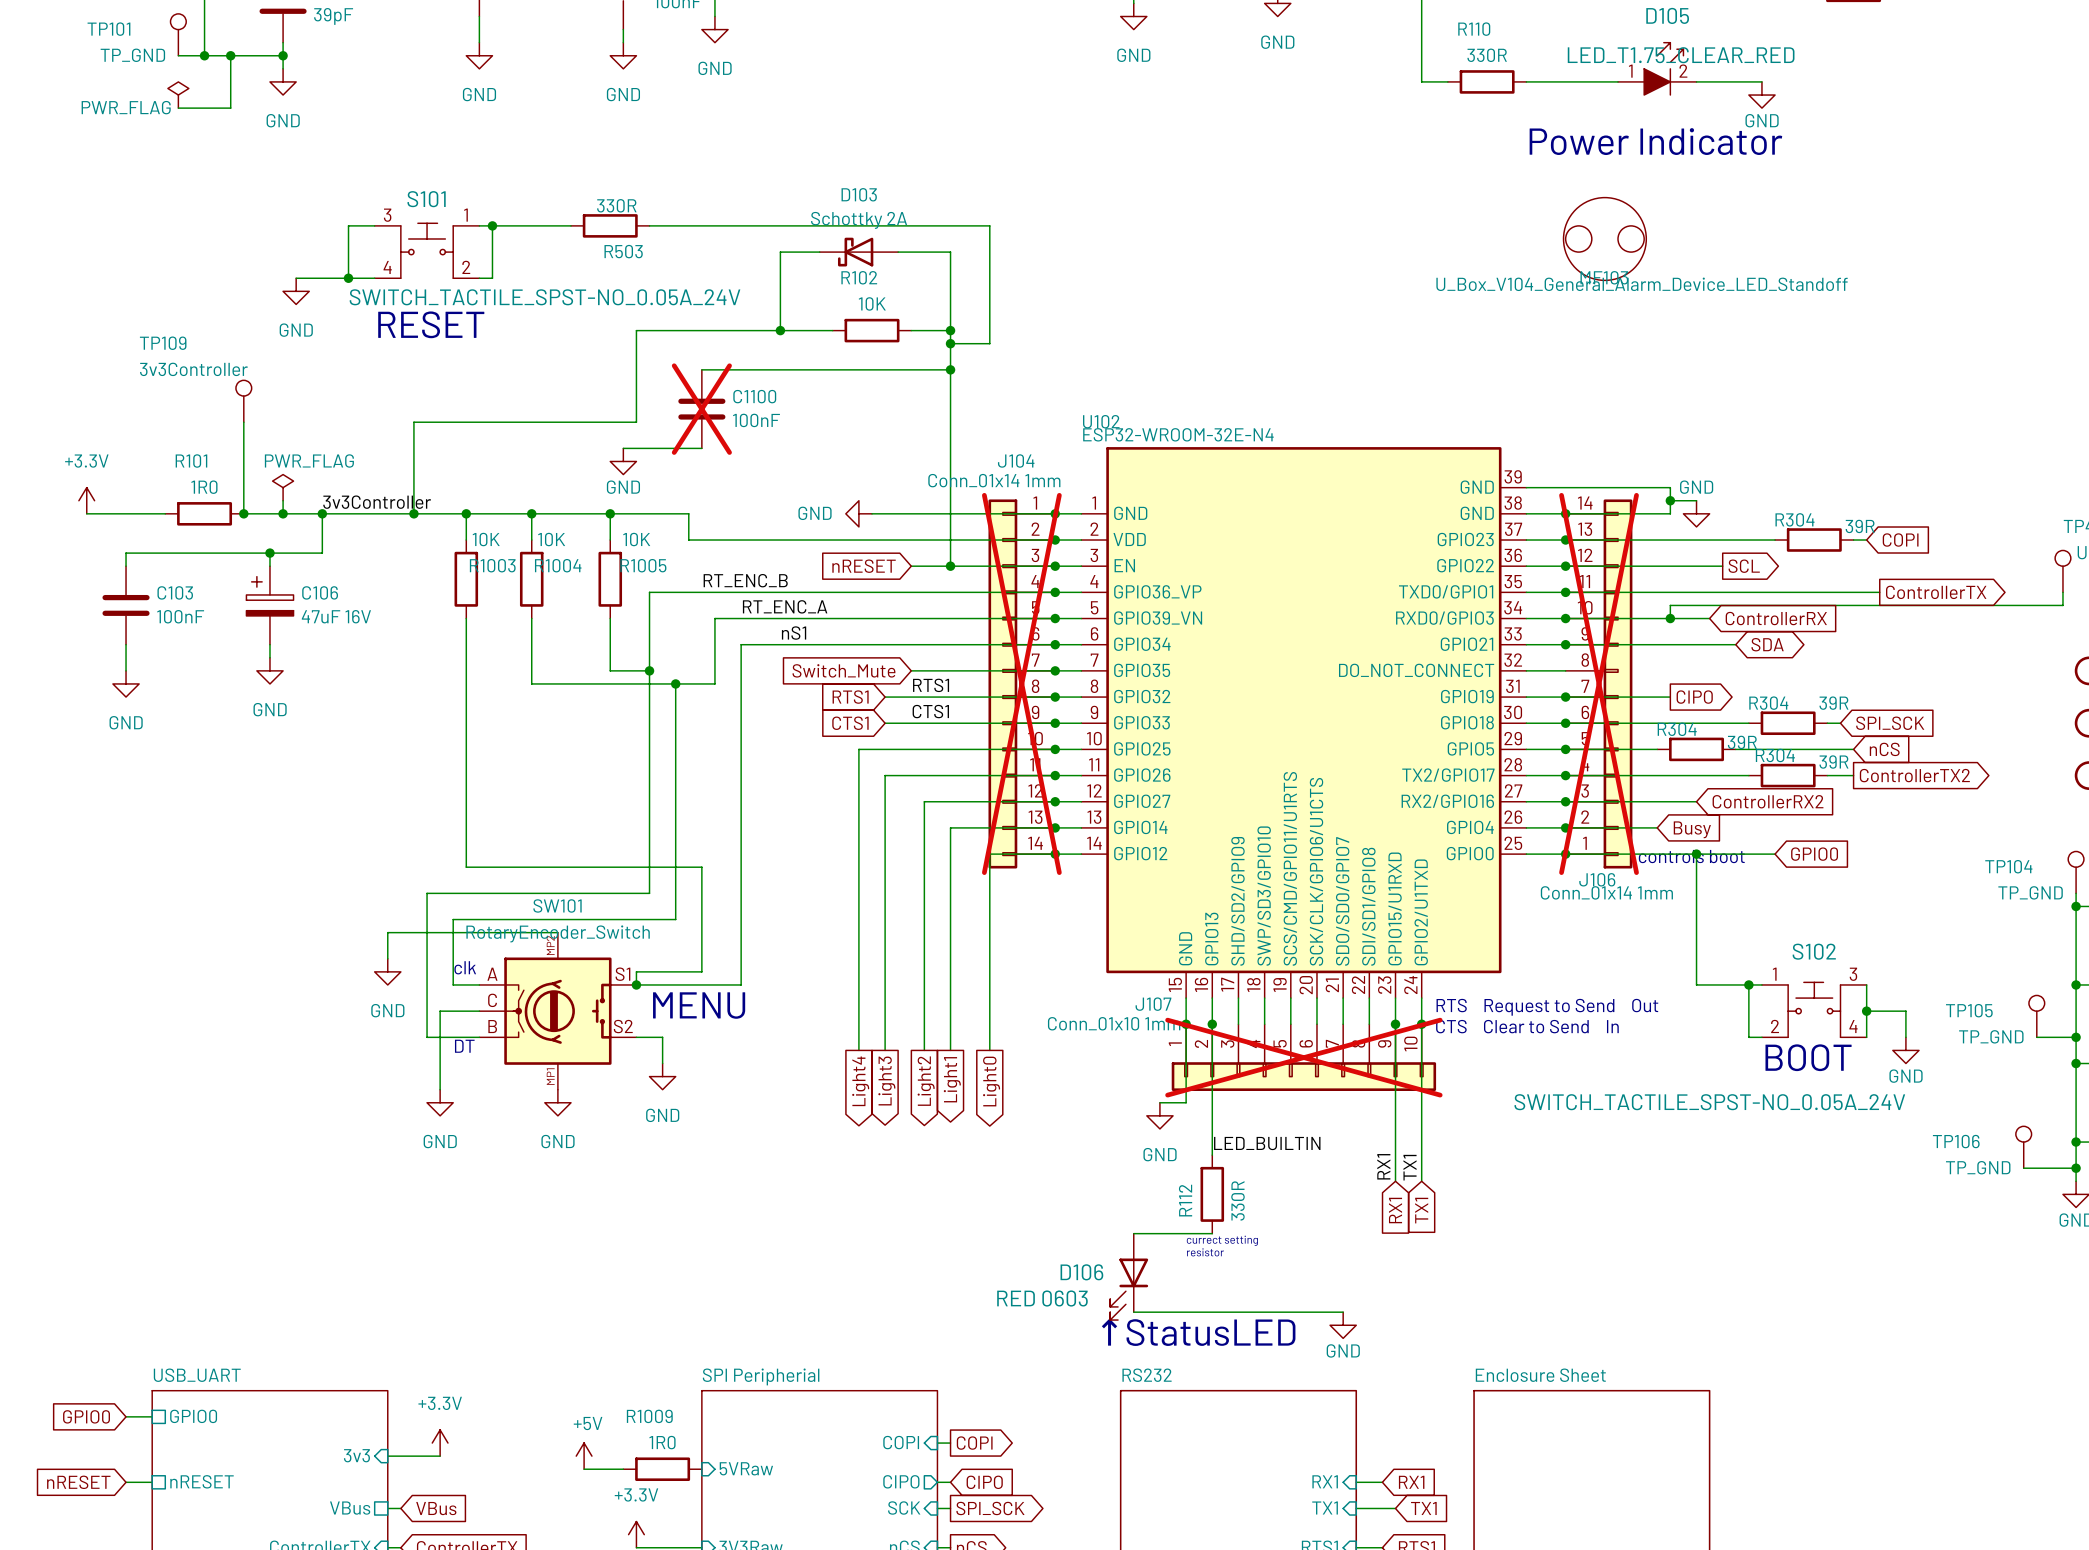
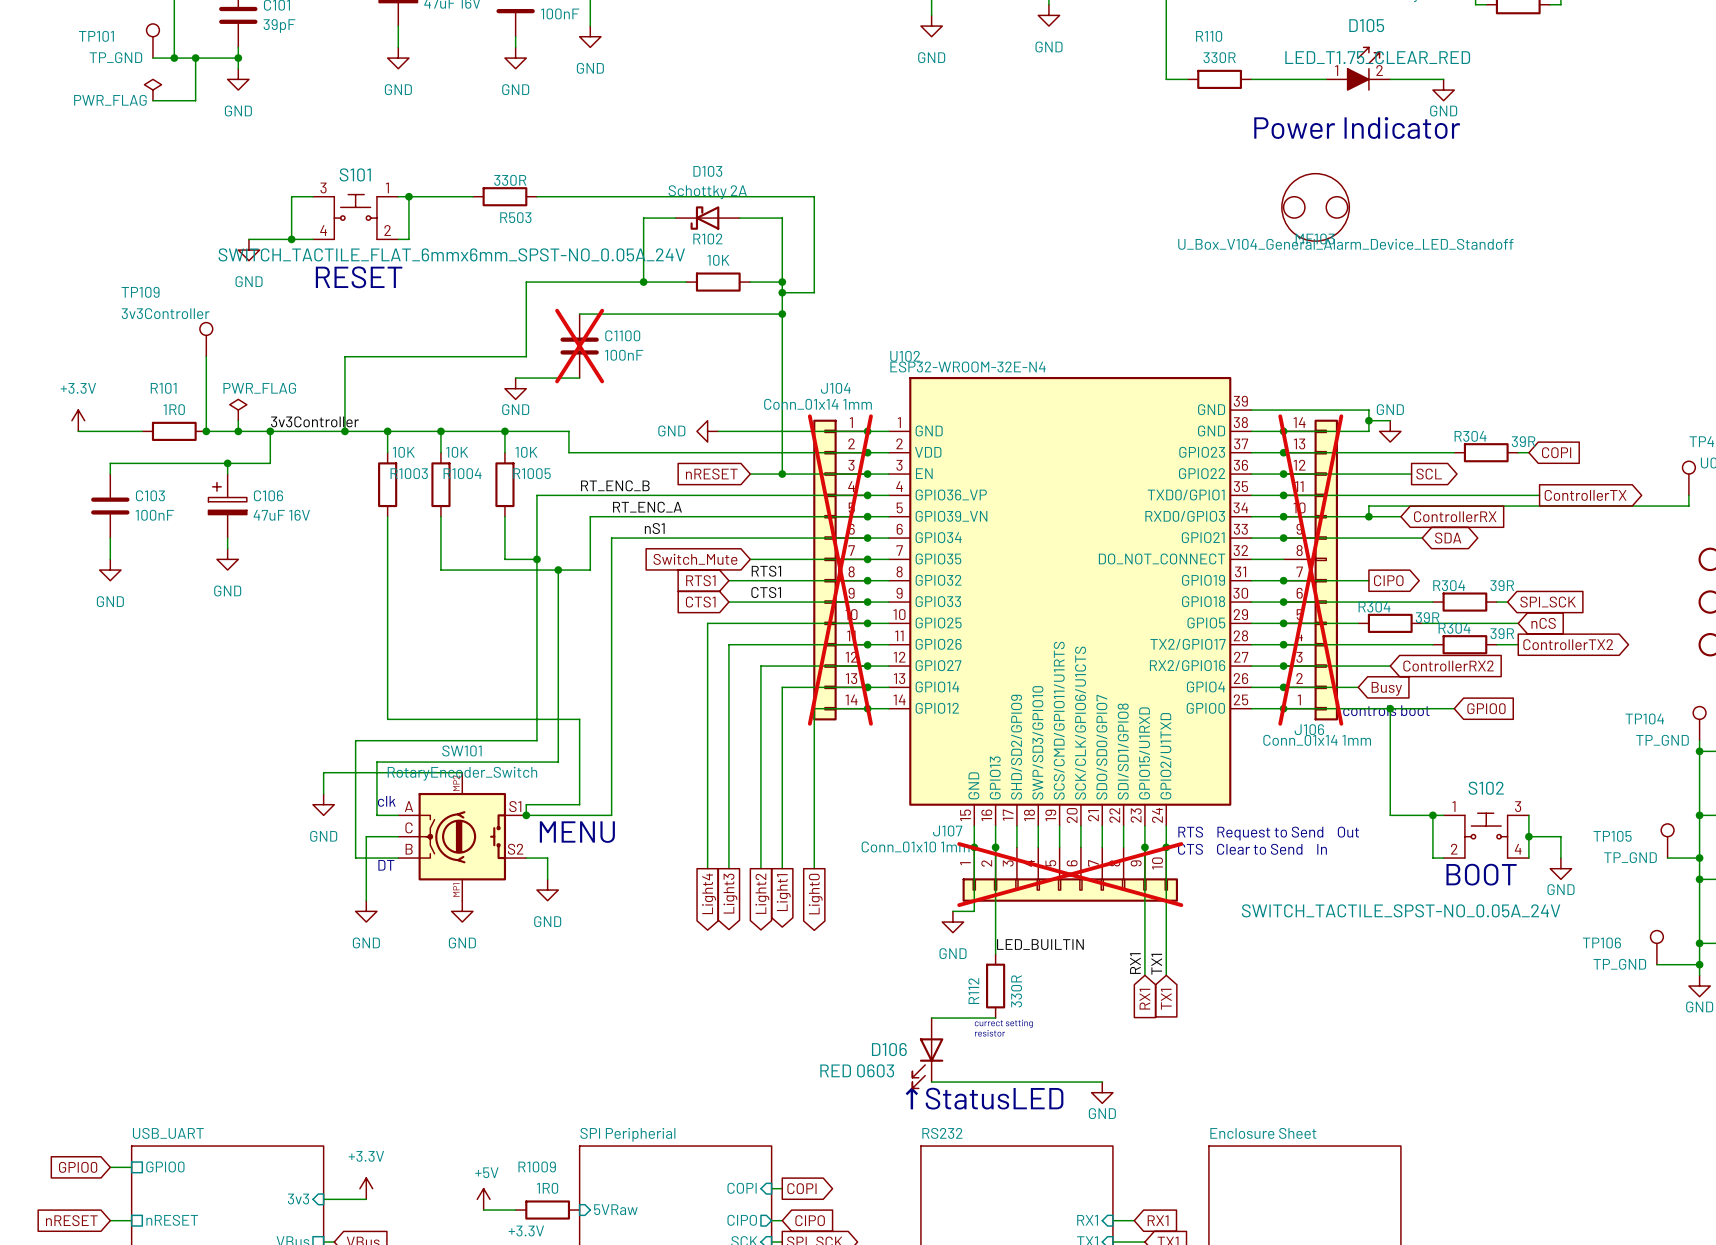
S101 value: SWITCH_TACTILE_SPST-NO_0.05A_24V (545, 297) -> SWITCH_TACTILE_FLAT_6mmx6mm_SPST-NO_0.05A_24V (451, 254)

